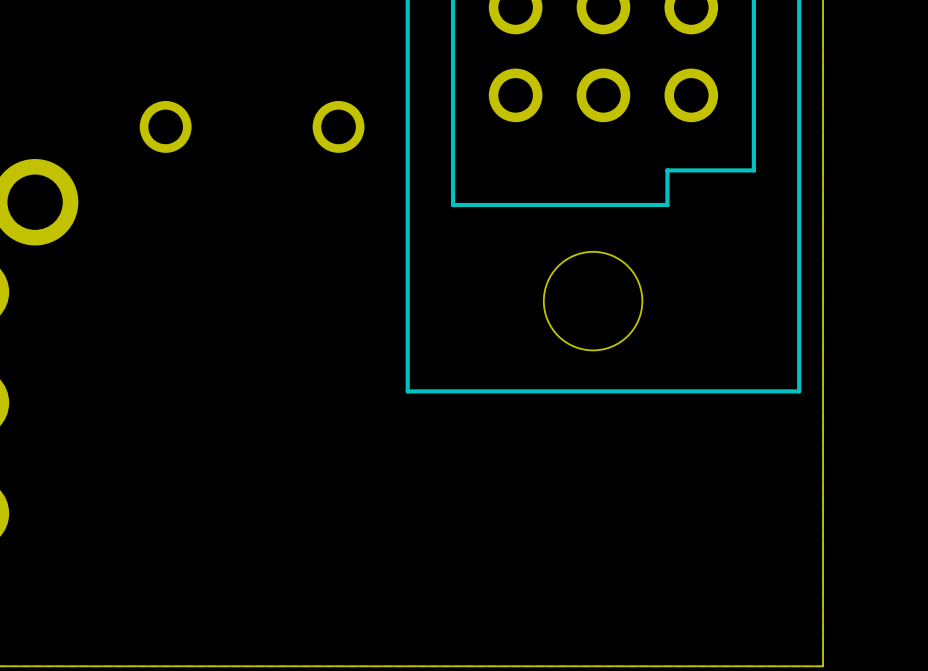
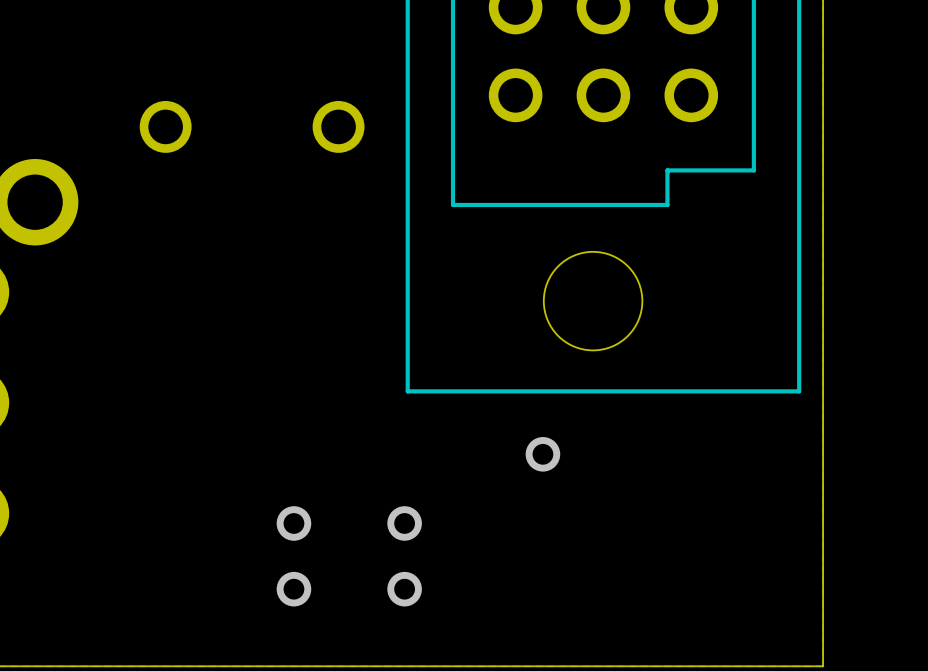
via: none -> (542, 454)
via: none -> (293, 523)
via: none -> (404, 523)
via: none -> (293, 589)
via: none -> (404, 589)

